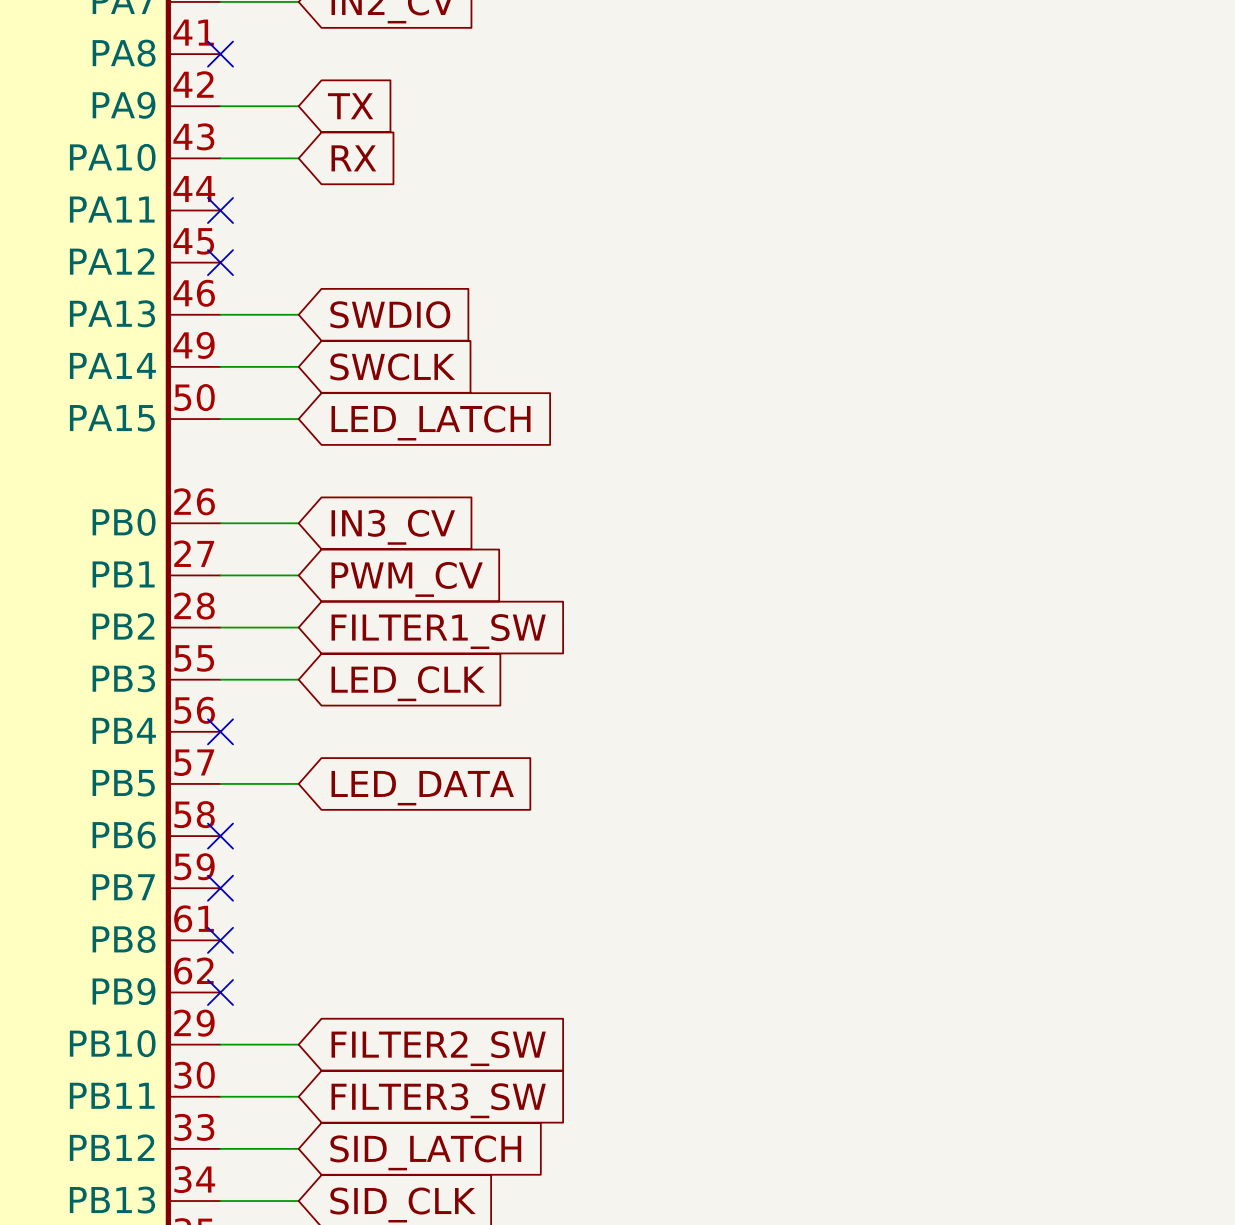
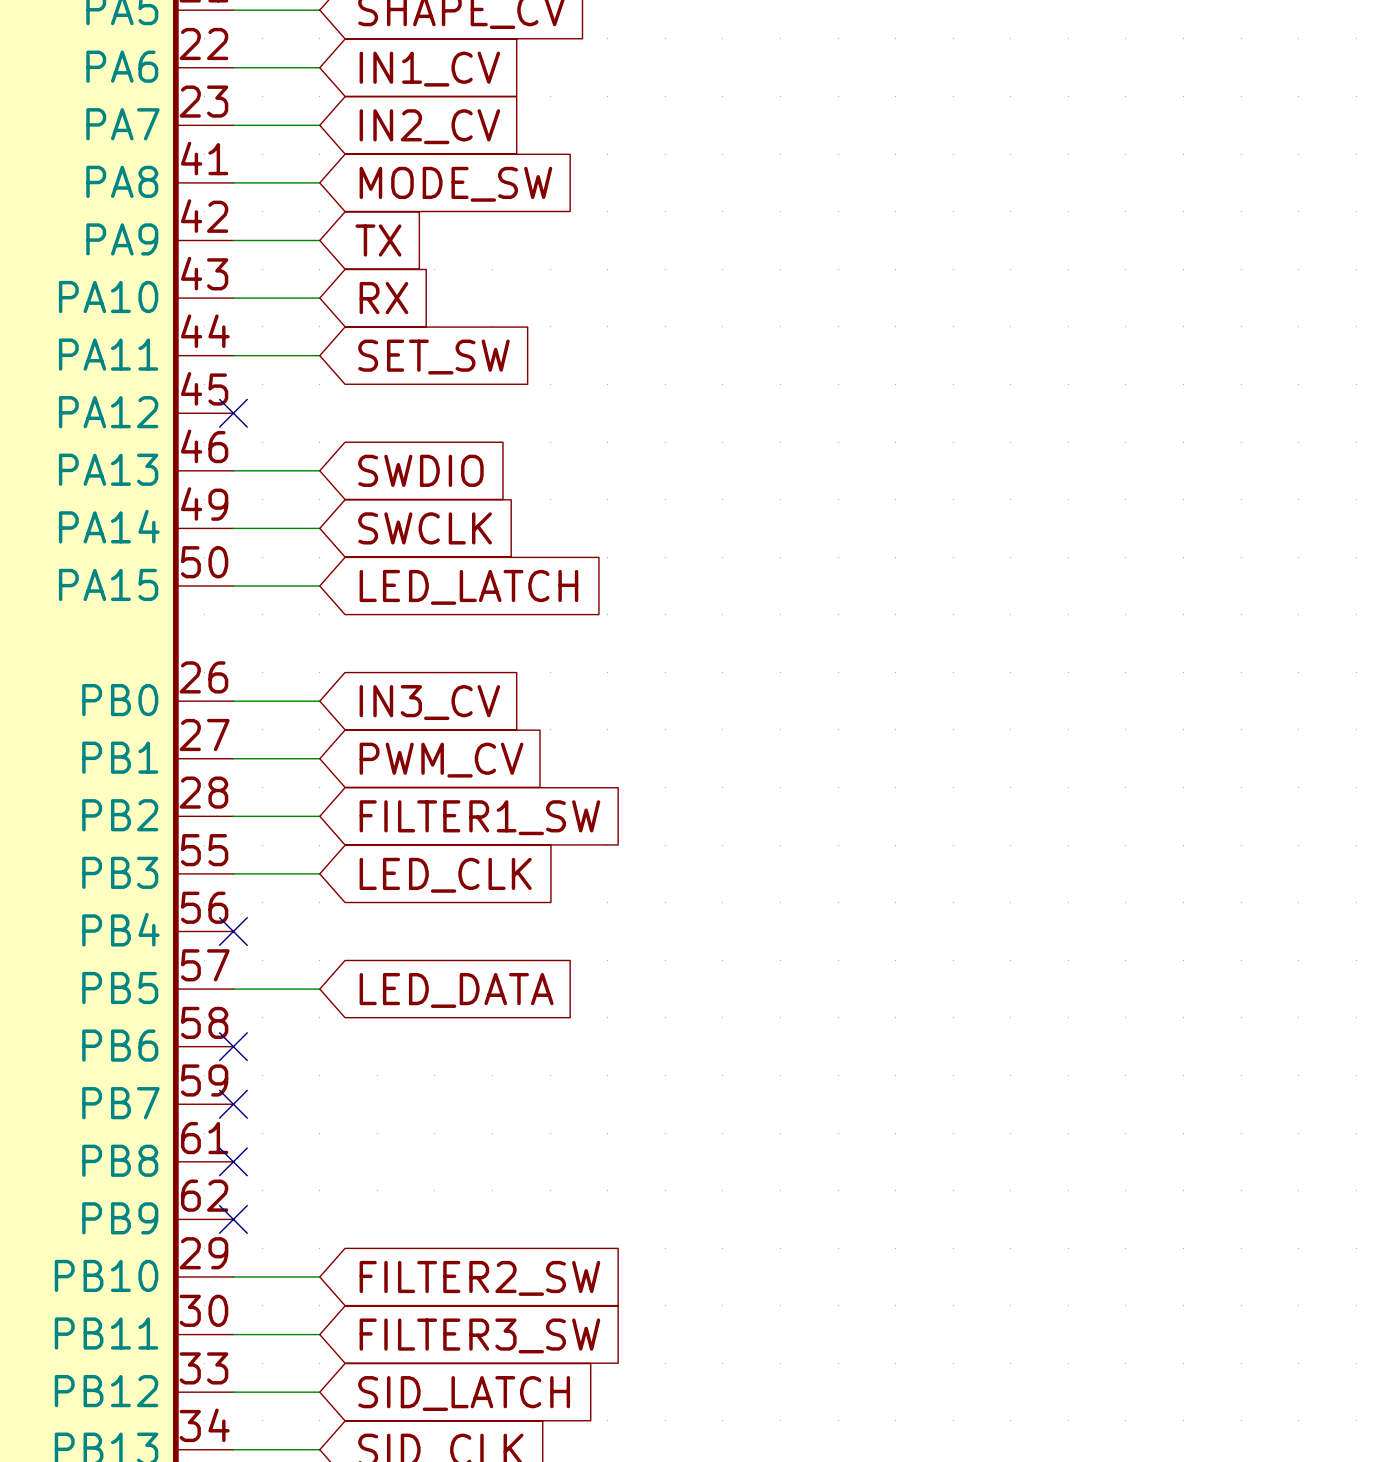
wire: none -> (233, 182) (319, 182)
no-connect mark: (220, 54) -> none
global label: none -> MODE_SW (455, 184)
wire: none -> (233, 355) (319, 355)
no-connect mark: (220, 210) -> none
global label: none -> SET_SW (433, 357)

